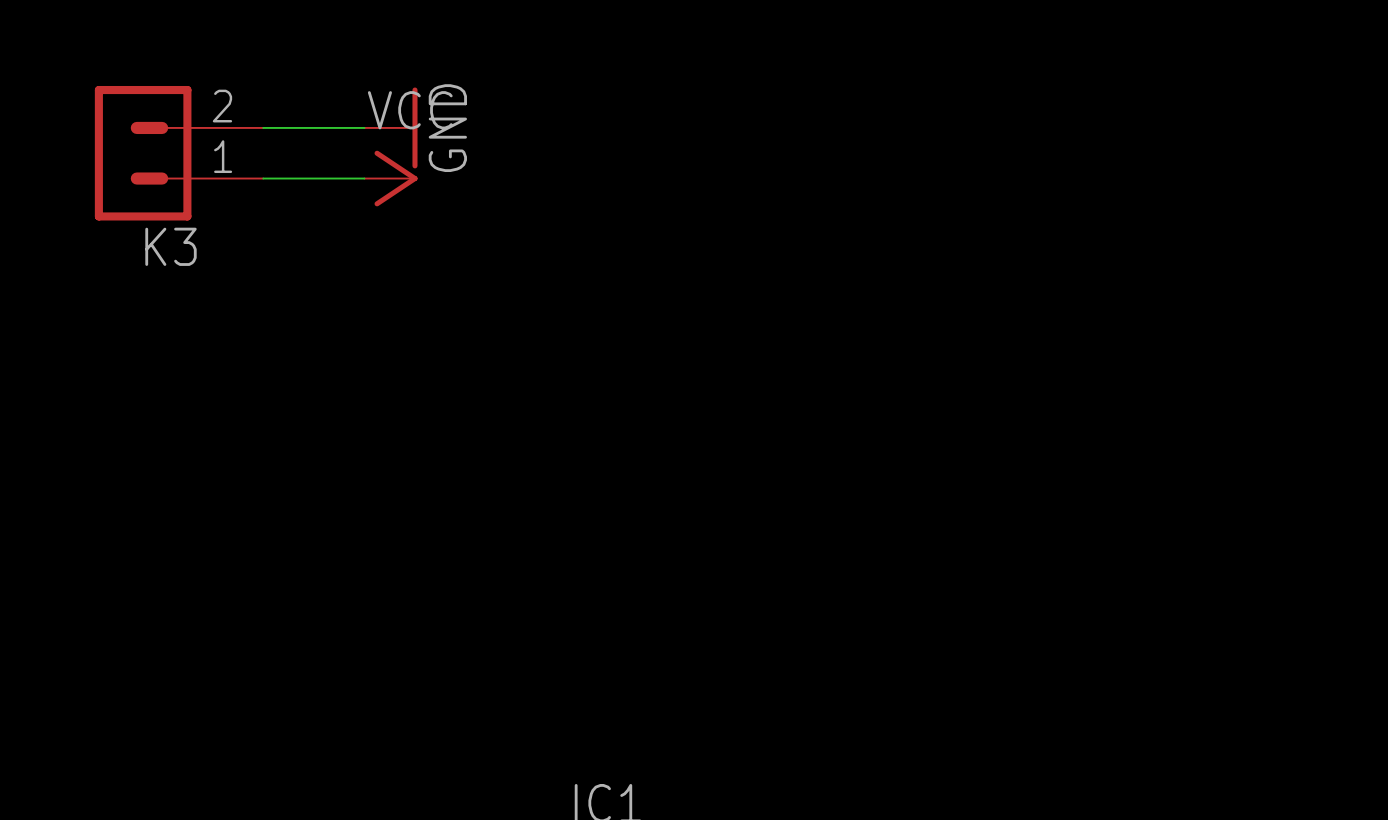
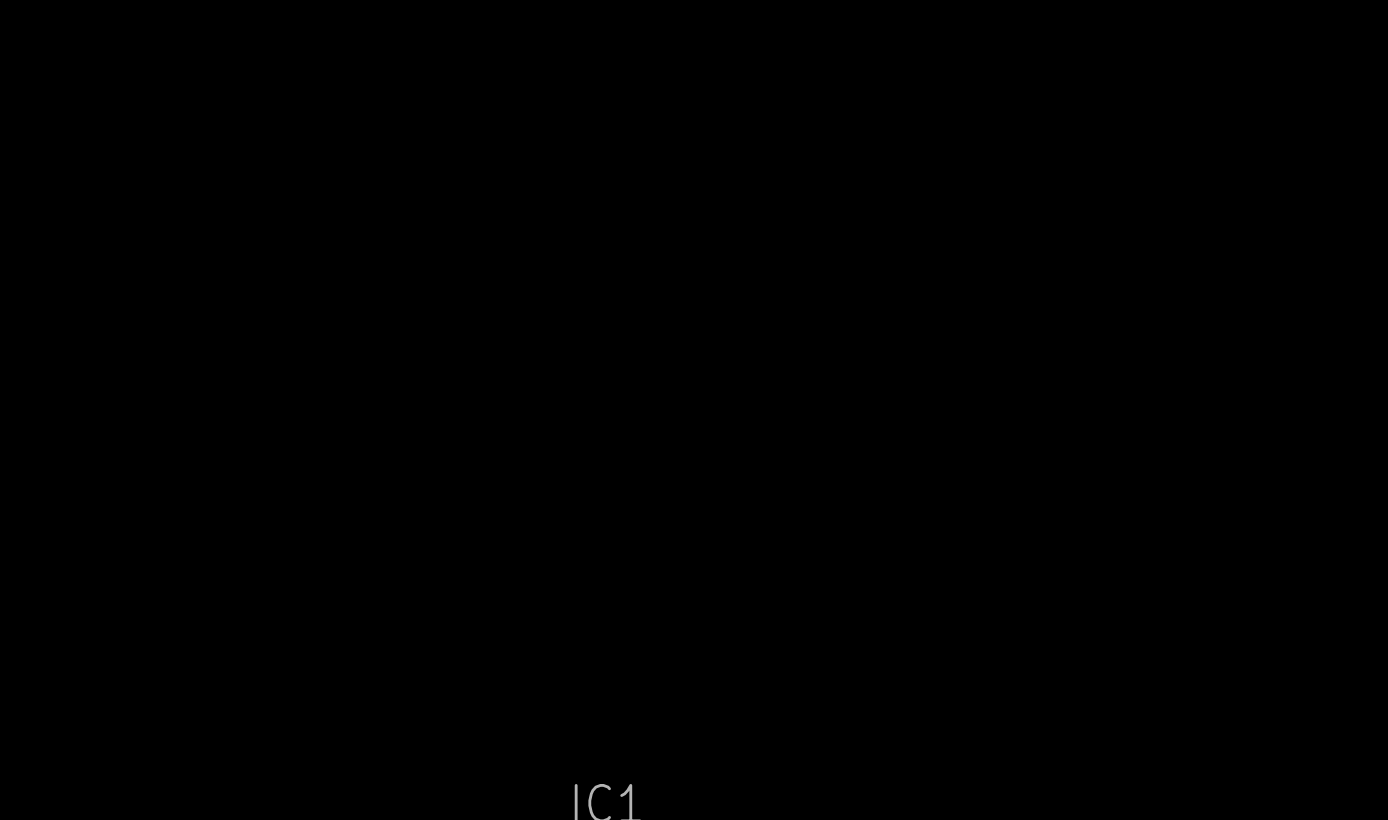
wire: (263, 127) (364, 127) -> none
power symbol: GND (390, 127) -> none
K3: (179, 153) -> none
wire: (263, 178) (364, 178) -> none
power symbol: VCC (390, 178) -> none

